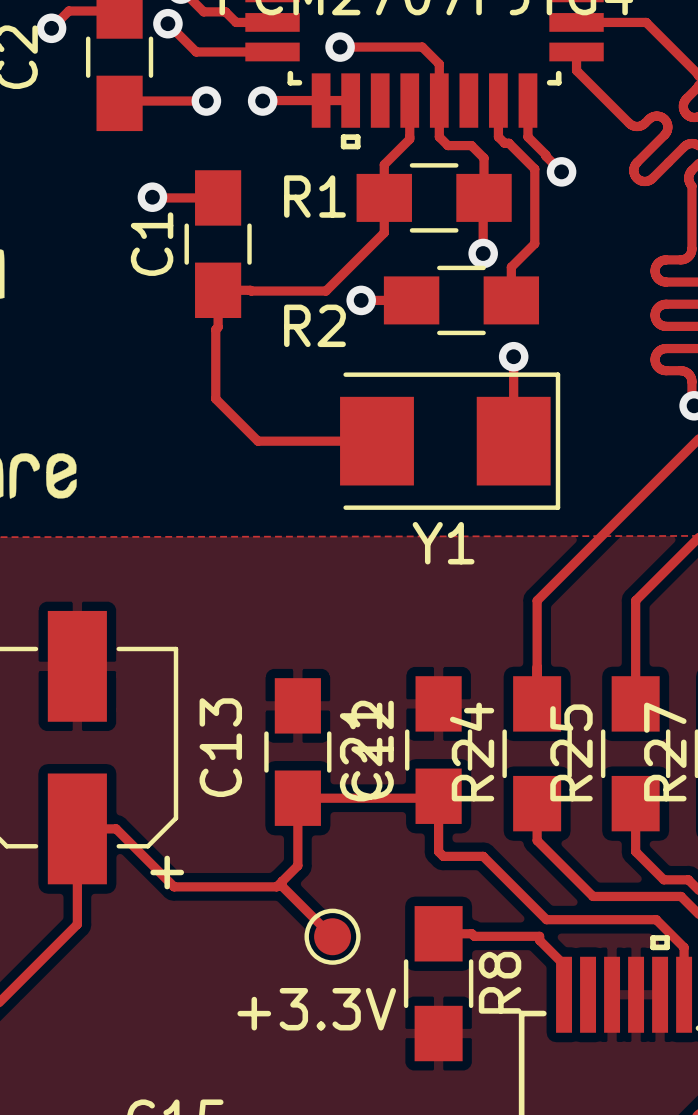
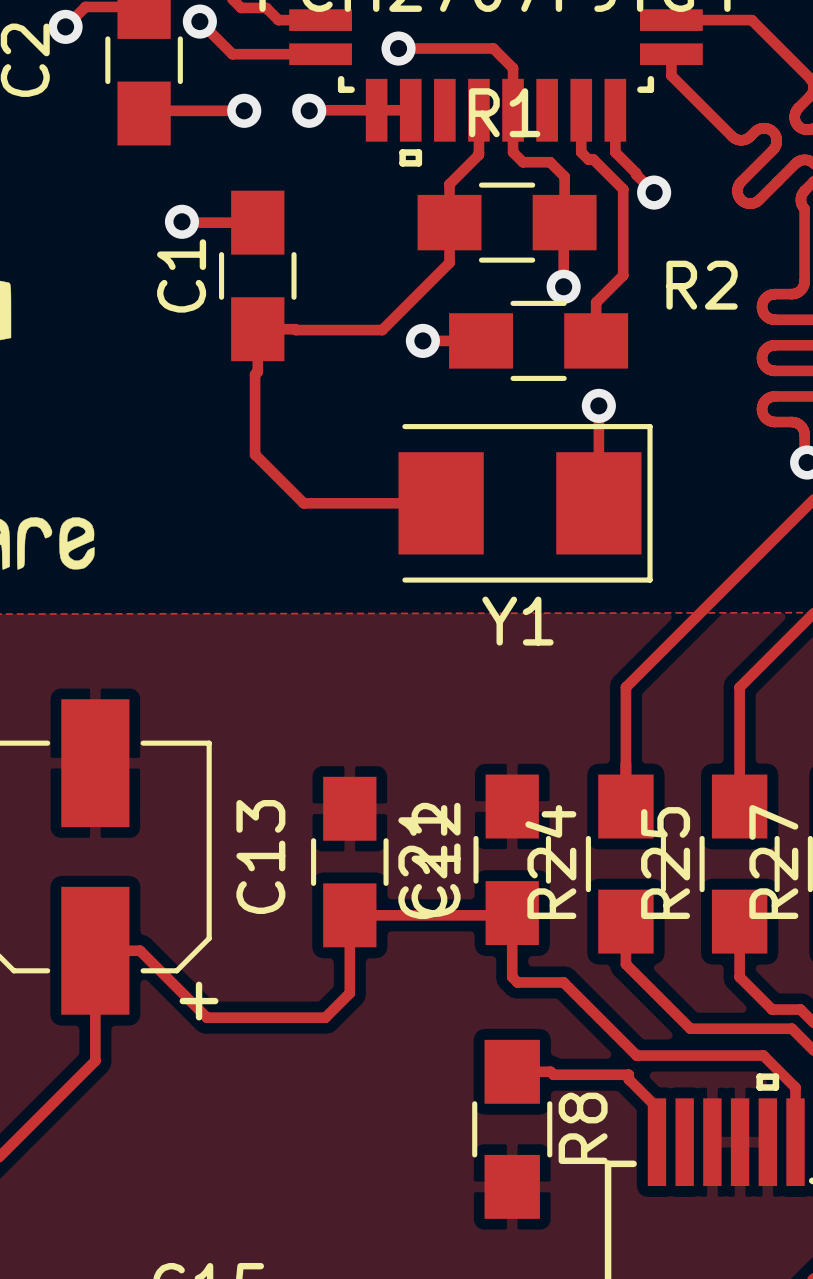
R1 name position: R1 (314, 196) -> R1 (504, 112)
R2 name position: R2 (314, 325) -> R2 (702, 285)
track: (282, 881) (282, 886) (332, 936) -> none
+3.3V: (332, 936) -> none

